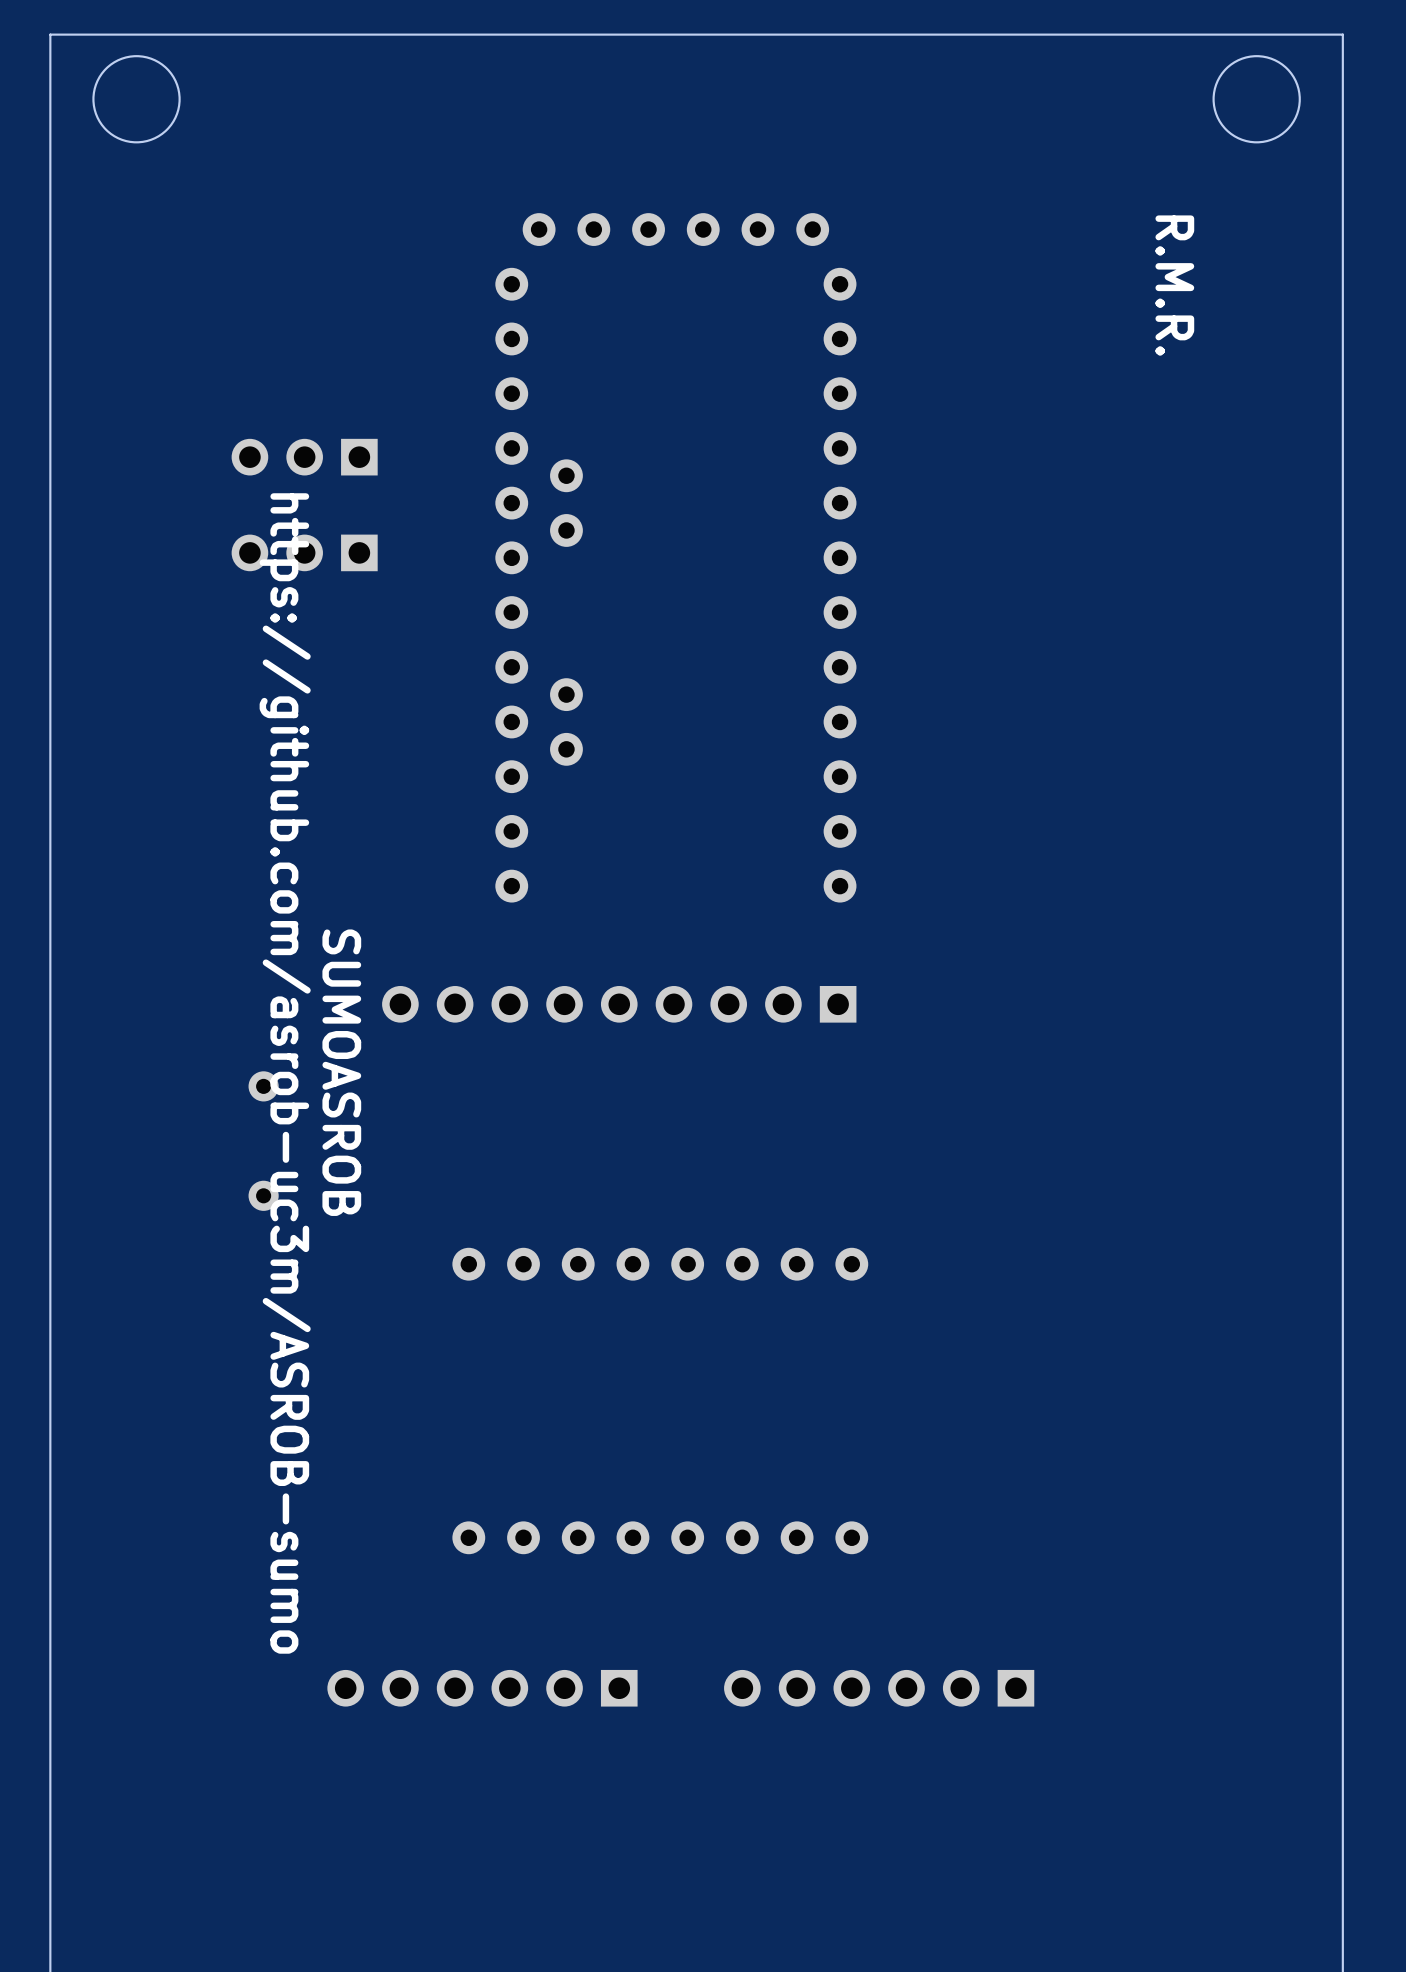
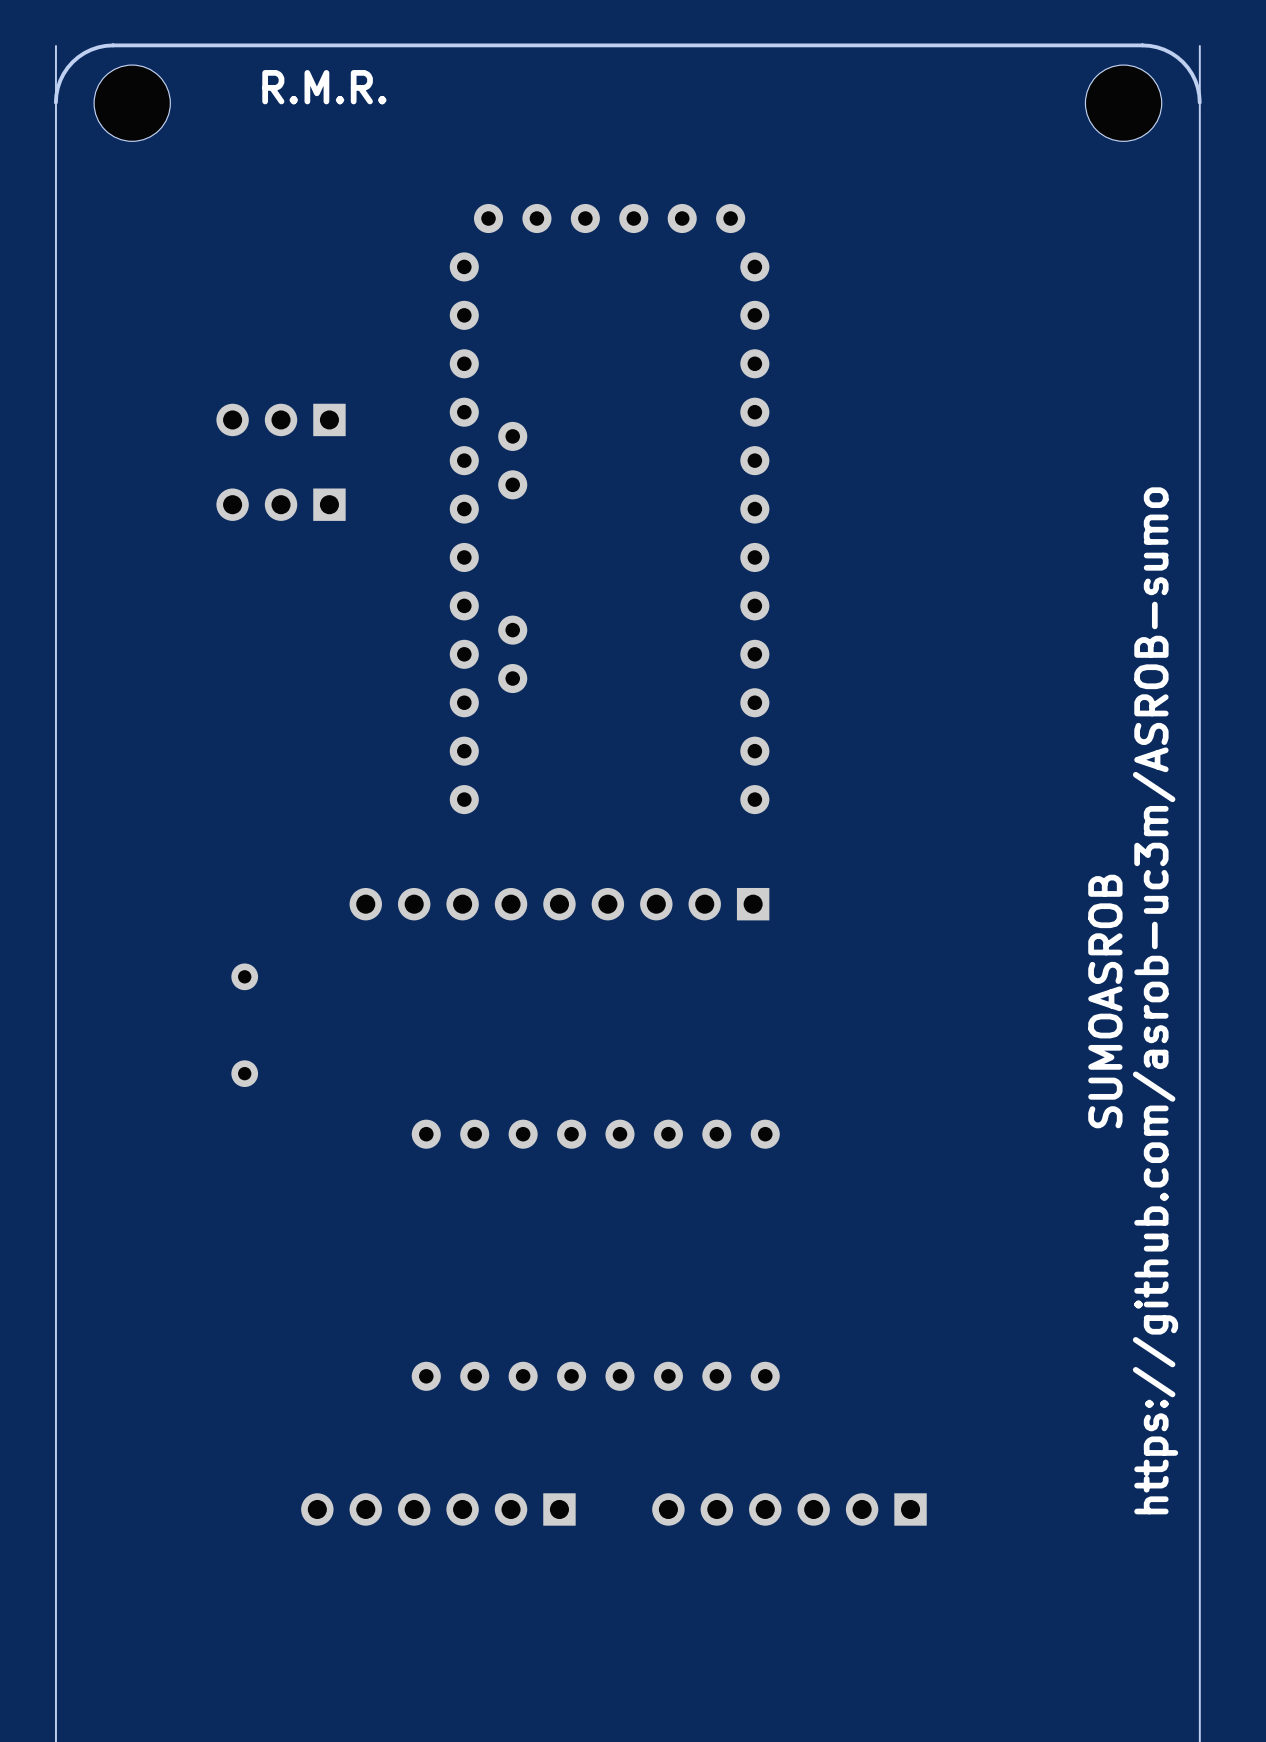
board edge: (1342, 34) (50, 34) -> none
round board edge: [92, 55, 181, 144] -> none
round board edge: [1212, 55, 1301, 144] -> none
text: none -> R.M.R. (324, 87)
board edge: none -> (1199, 102) (1195, 80) (1182, 62) (1164, 49) (1142, 45) (113, 45) (91, 49) (72, 62) (60, 80) (55, 102)
part: none -> (132, 103)
part: none -> (1123, 103)
text: R.M.R. (1174, 285) -> none
text: SUMOASROB (341, 1072) -> none
text: https://github.com/asrob-uc3m/ASROB-sumo (285, 1073) -> none
text: none -> https://github.com/asrob-uc3m/ASROB-sumo (1155, 1000)
text: none -> SUMOASROB (1105, 1001)

